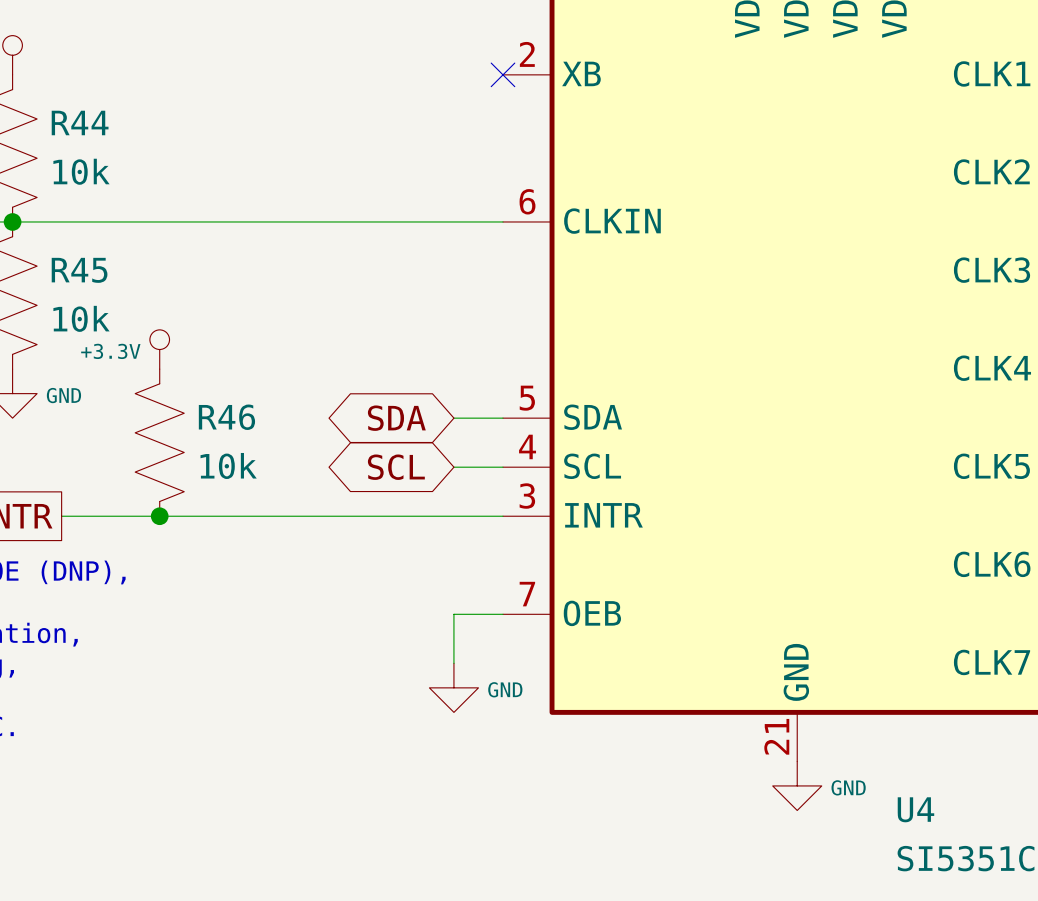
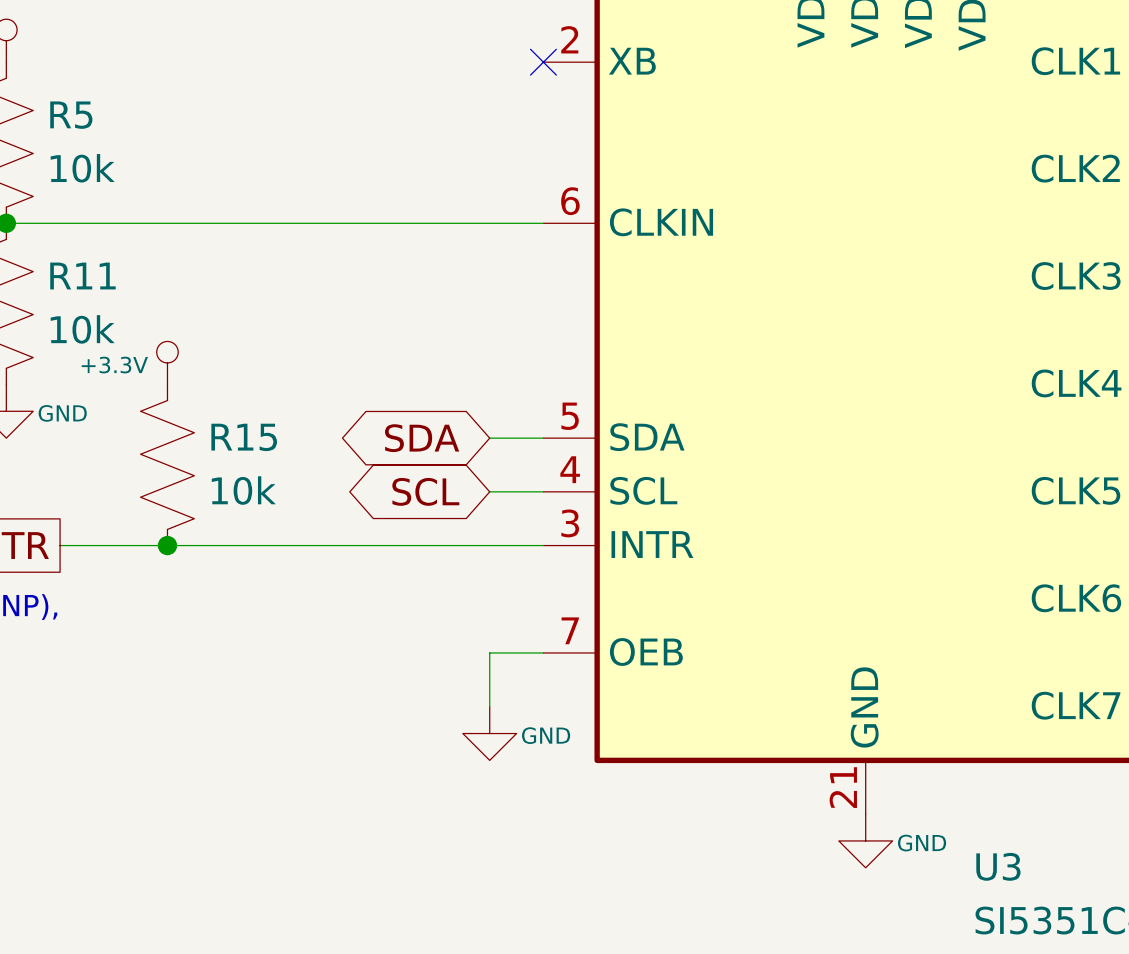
R44 name: R44 (80, 122) -> R5 (71, 115)
R45 name: R45 (79, 270) -> R11 (82, 276)
R46 name: R46 (226, 417) -> R15 (244, 437)
U4 name: U4 (915, 809) -> U3 (998, 866)

